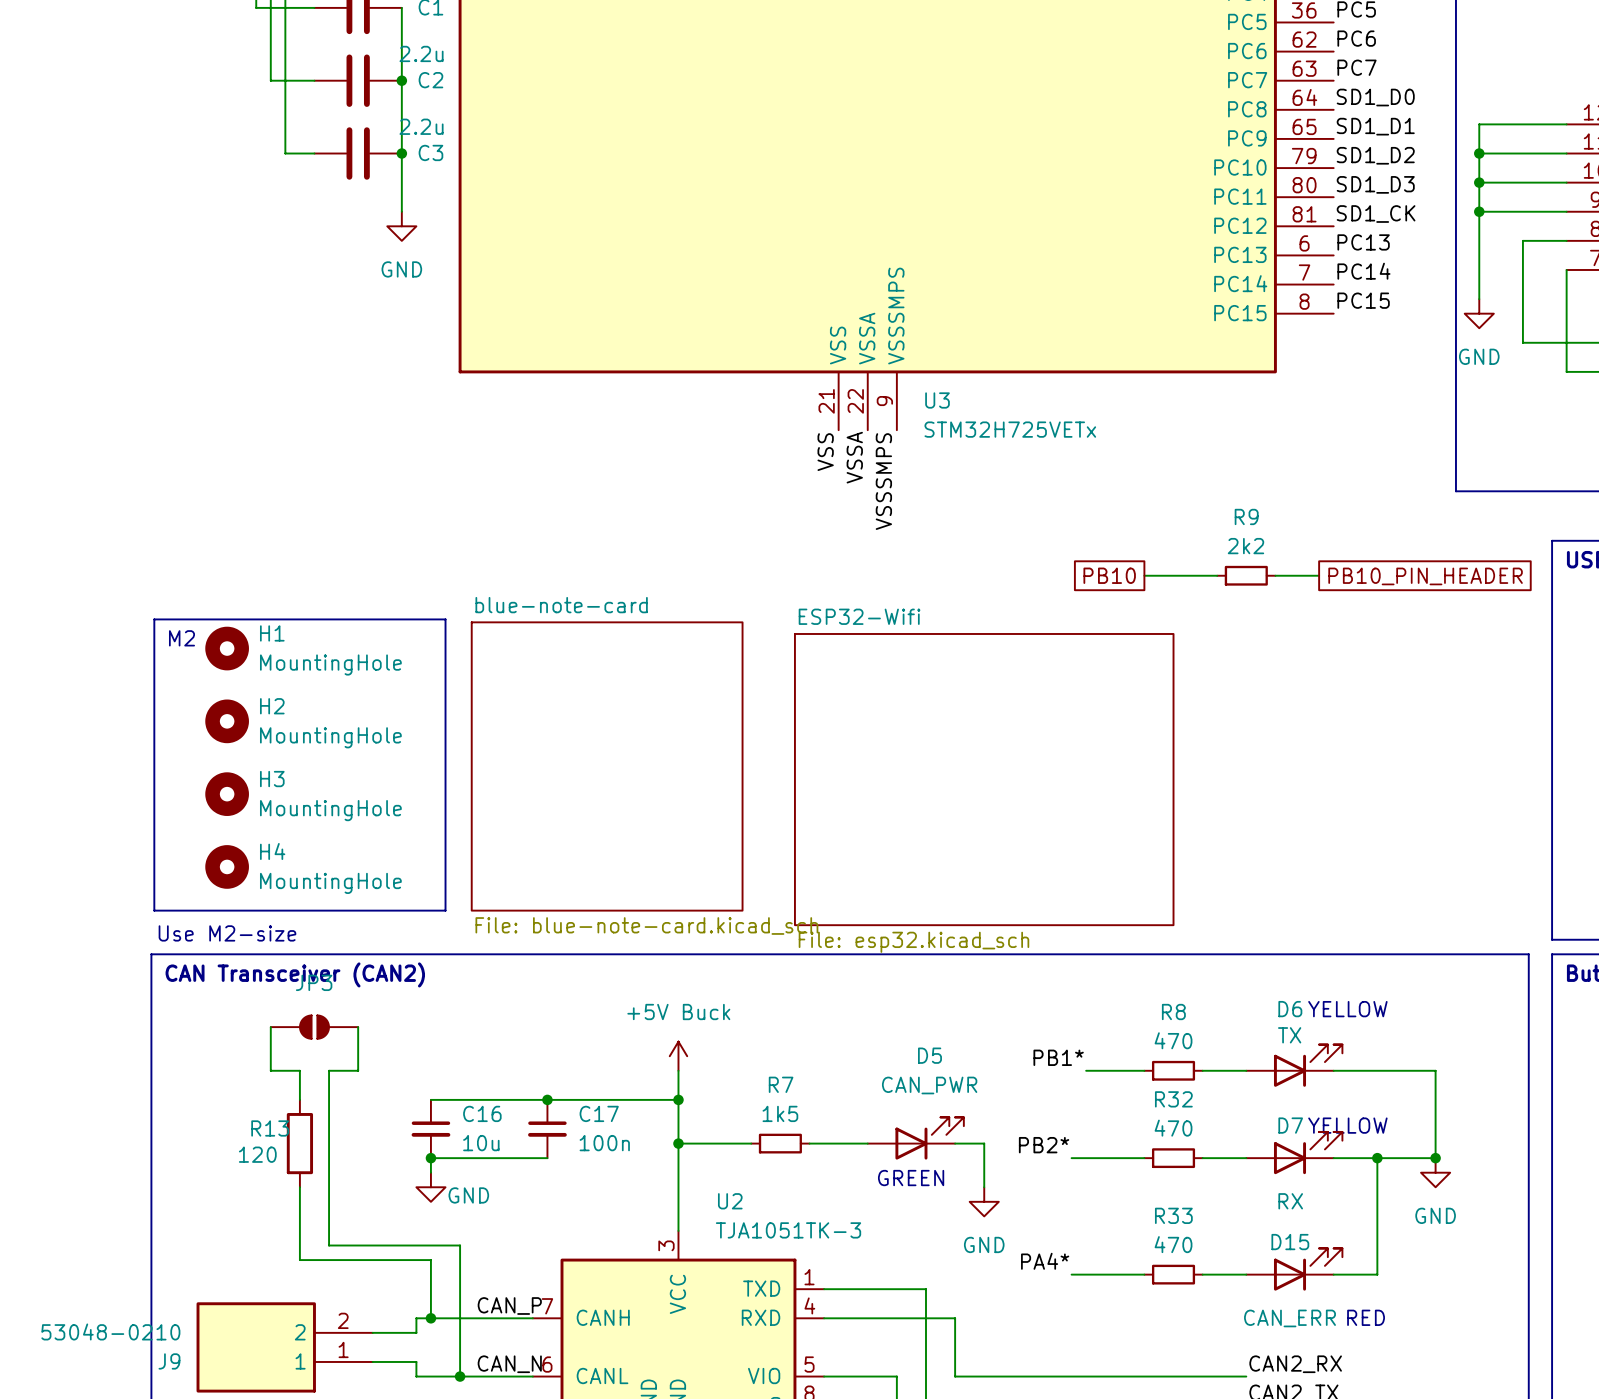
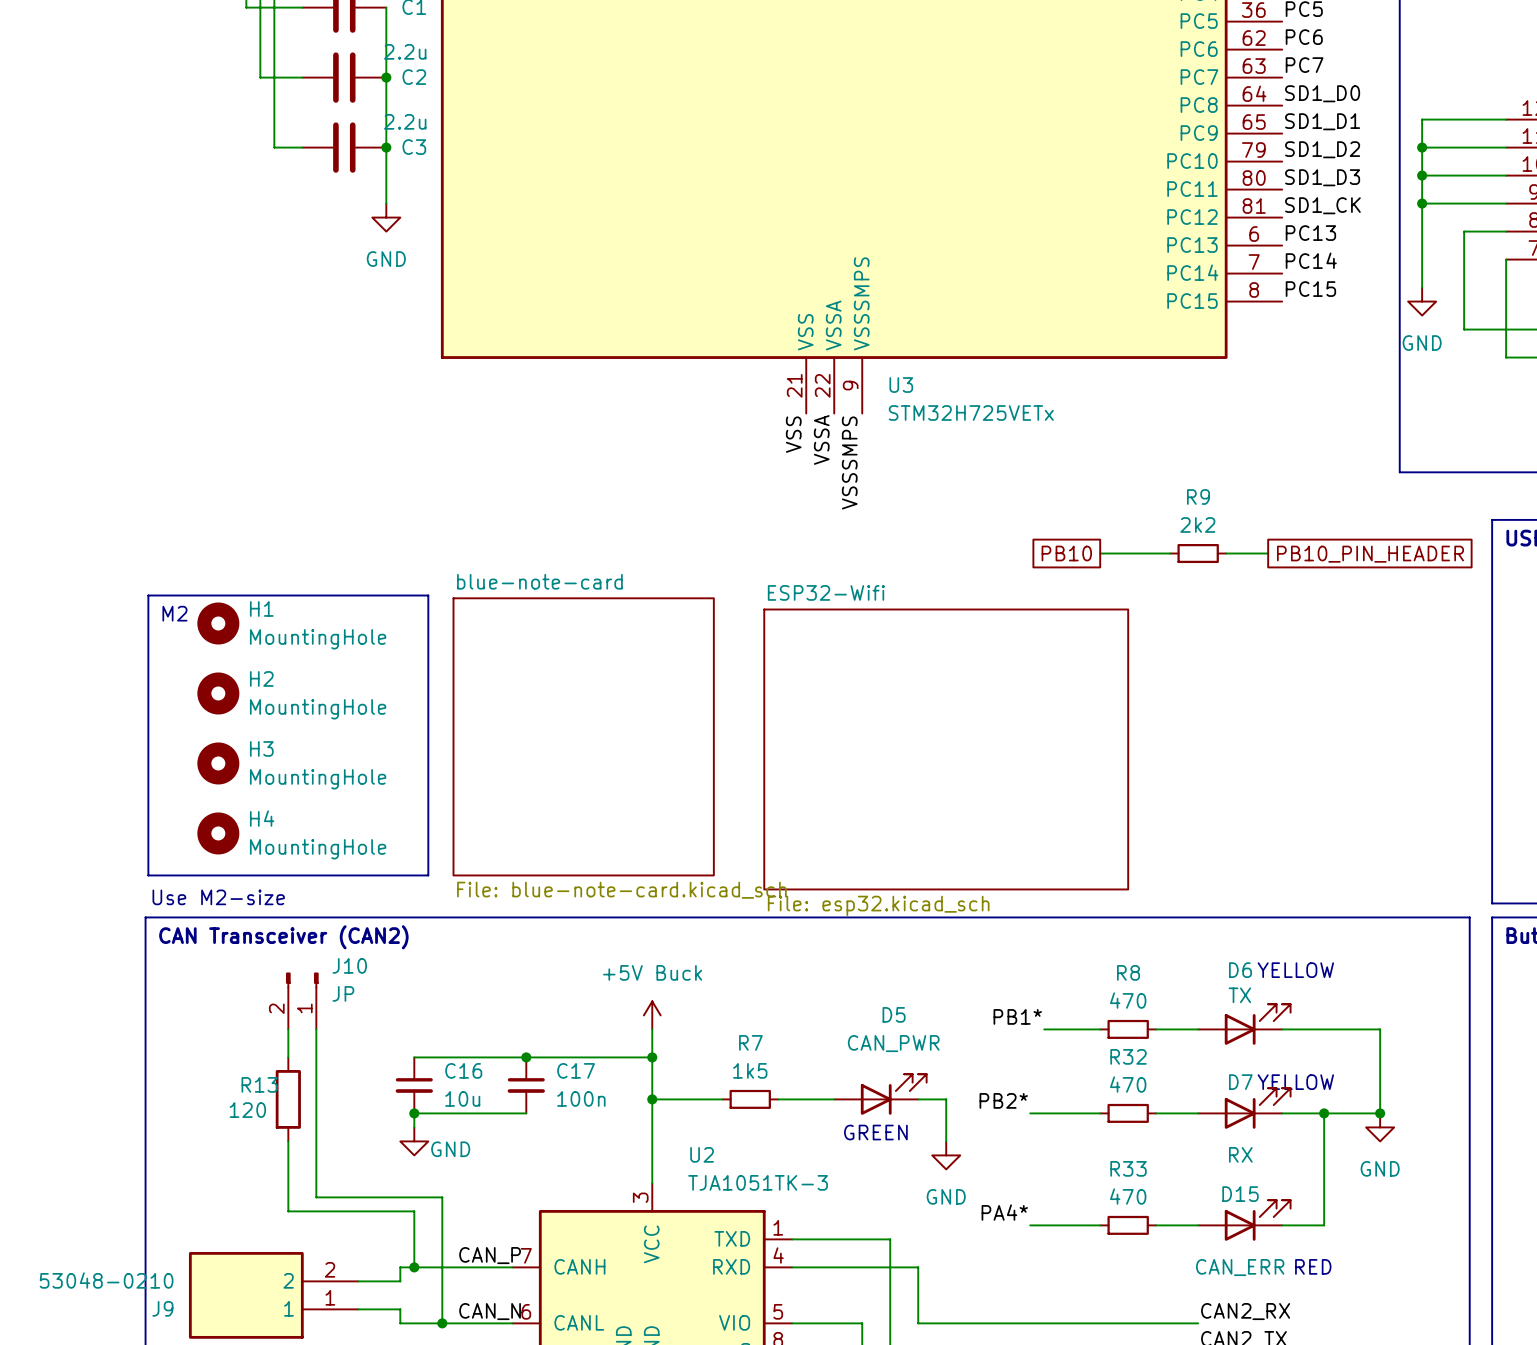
wire: (270, 1027) (270, 1070) (299, 1070) -> none
JP3: (314, 1027) -> none
wire: (358, 1027) (358, 1070) (329, 1070) -> none
J10: none -> JP (302, 1001)

